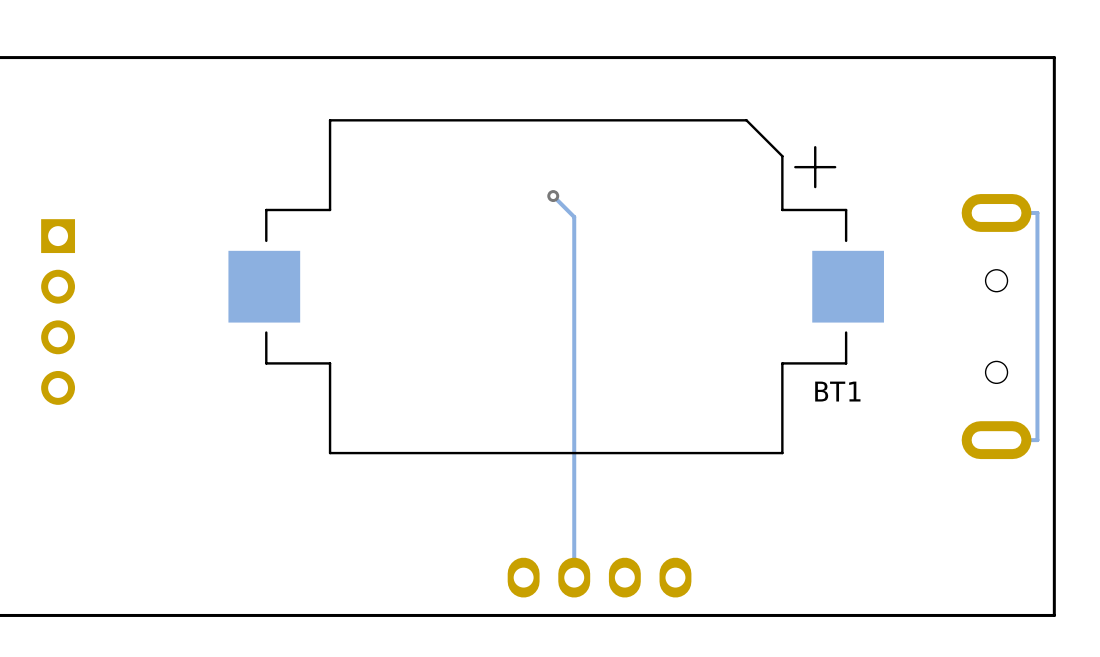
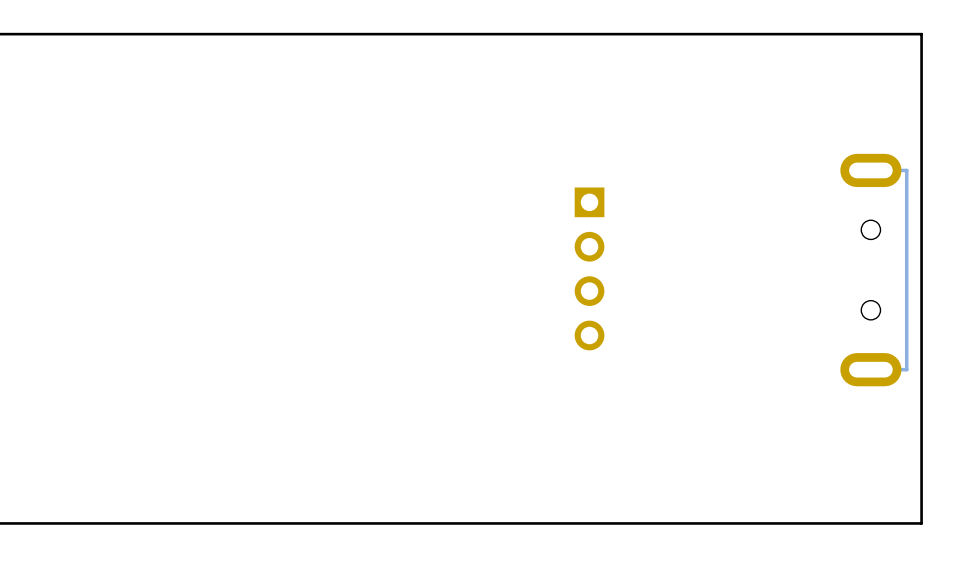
track: (553, 196) (574, 217) (574, 577) -> none
via: (553, 196) -> none
BT1: (556, 286) -> none
part: (58, 312) -> none
part: none -> (589, 268)
part: (599, 577) -> none

